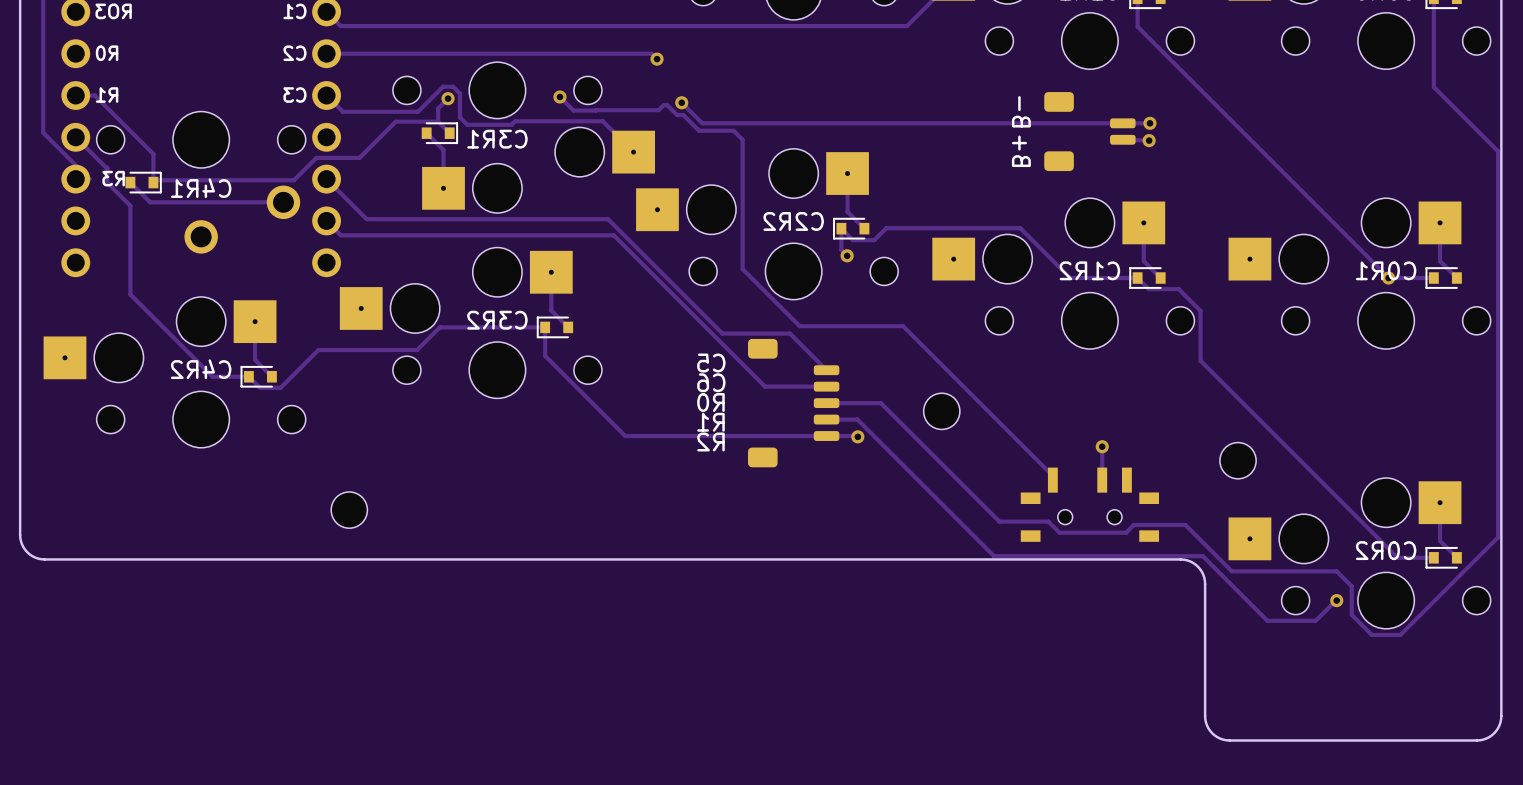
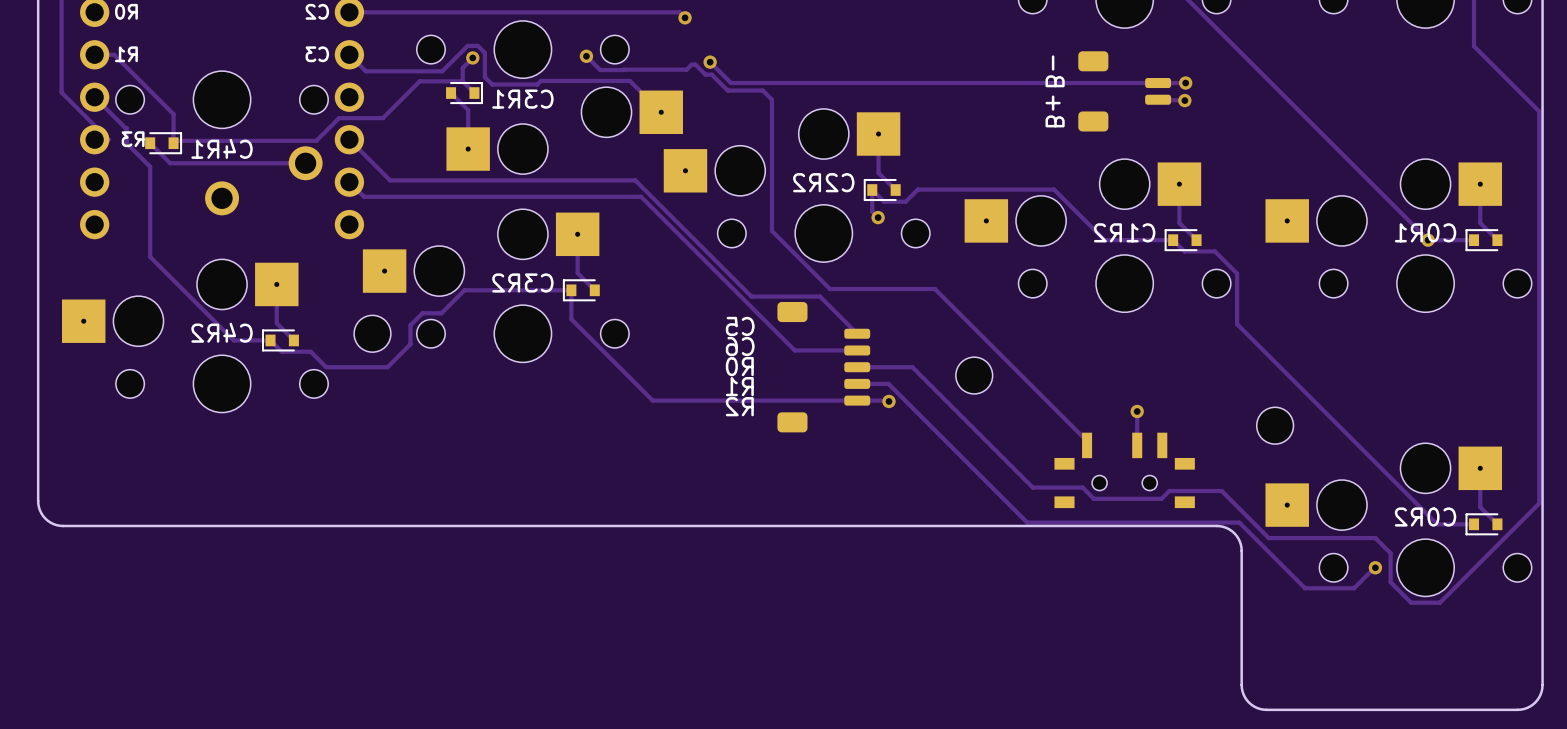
track: (398, 350) (318, 350) (280, 387) -> (422, 313) (410, 325) (410, 344) (387, 367) (326, 367) (310, 351) (302, 351)
part position: (349, 510) -> (372, 333)

